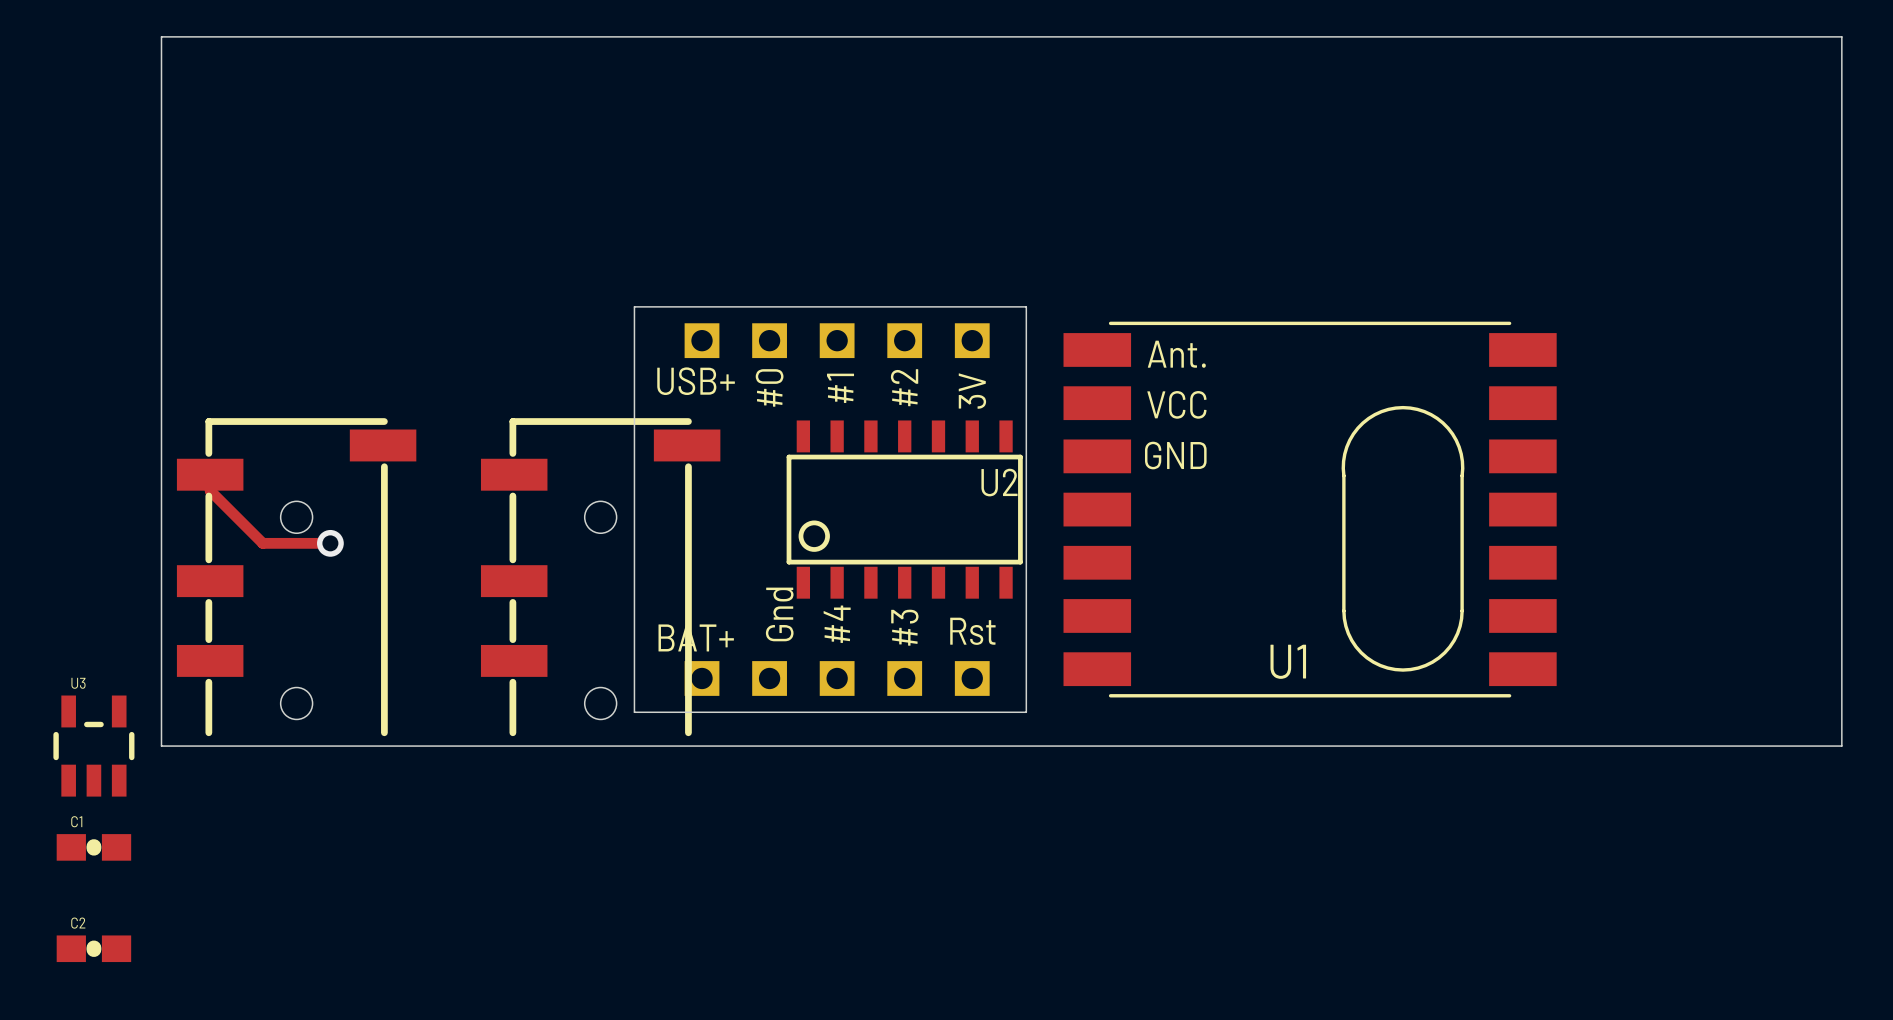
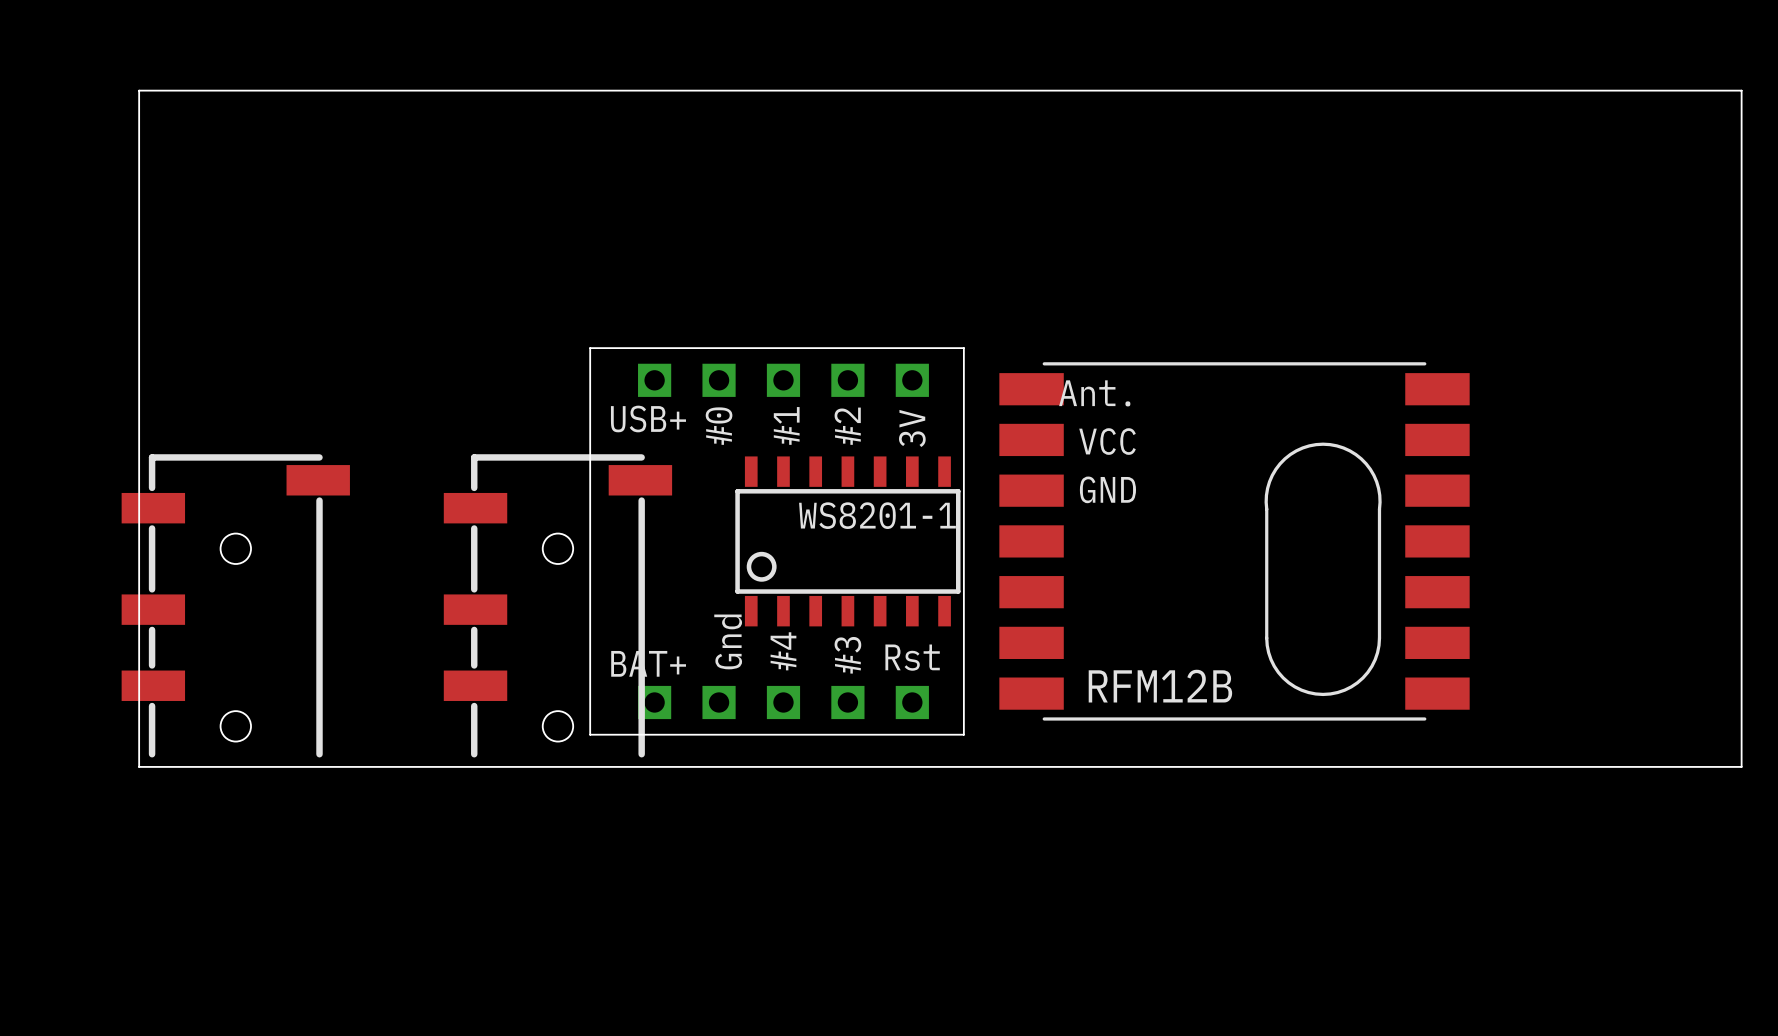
track: (210, 474) (210, 490) (262, 543) (330, 543) -> none
U2 name: U2 (999, 482) -> WS8201-1 (877, 515)
via: (330, 543) -> none
part position: (296, 577) -> (235, 605)
U1 name: U1 (1288, 661) -> RFM12B (1160, 686)
U3: (93, 746) -> none
C1: (93, 847) -> none
C2: (93, 948) -> none

